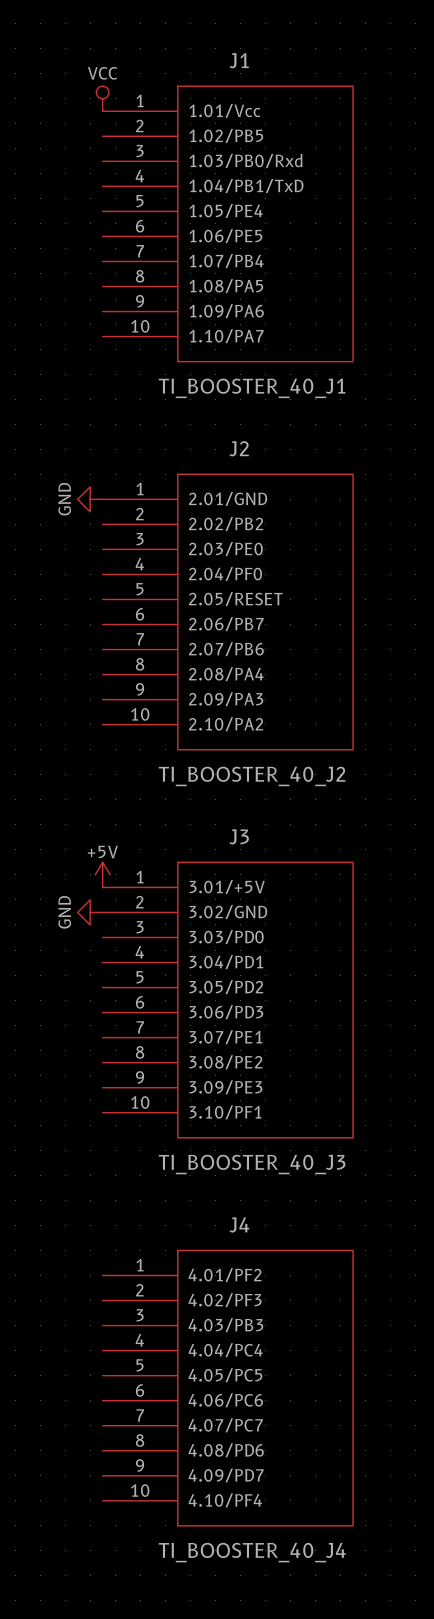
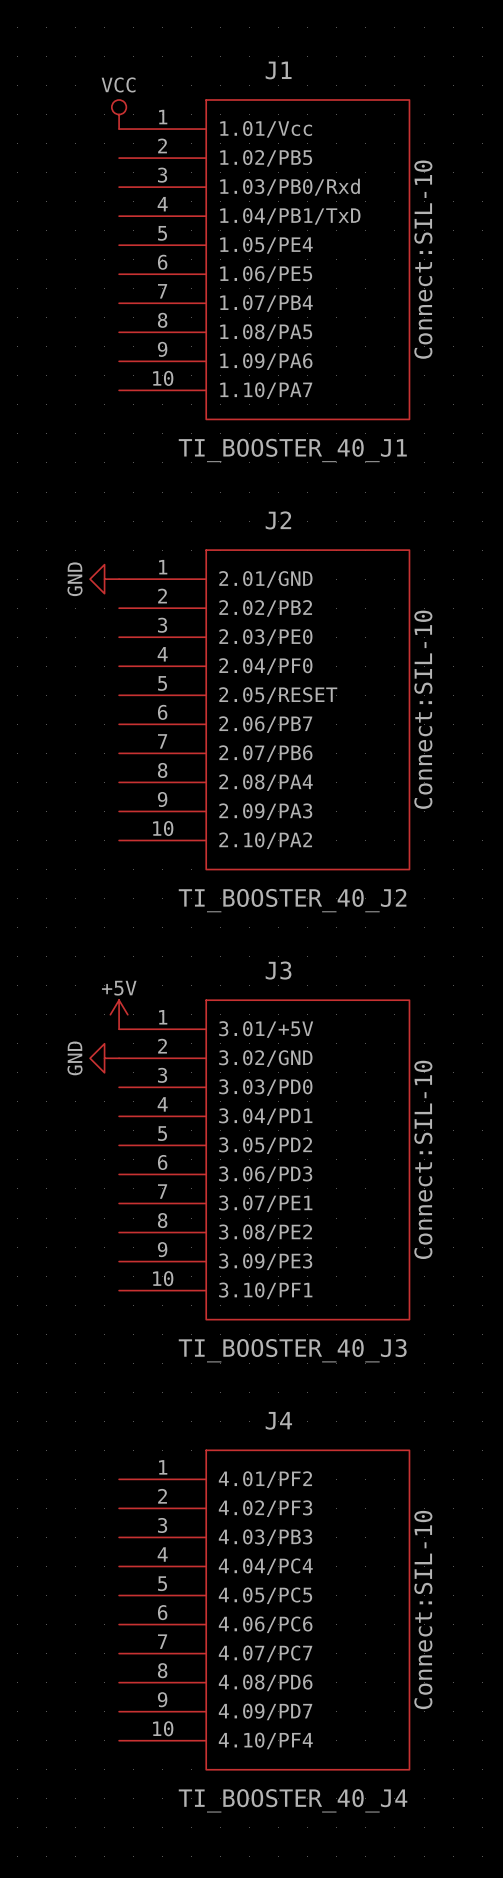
J1 text: none -> Connect:SIL-10 (423, 259)
J2 text: none -> Connect:SIL-10 (423, 709)
J3 text: none -> Connect:SIL-10 (423, 1159)
J4 text: none -> Connect:SIL-10 (423, 1610)

